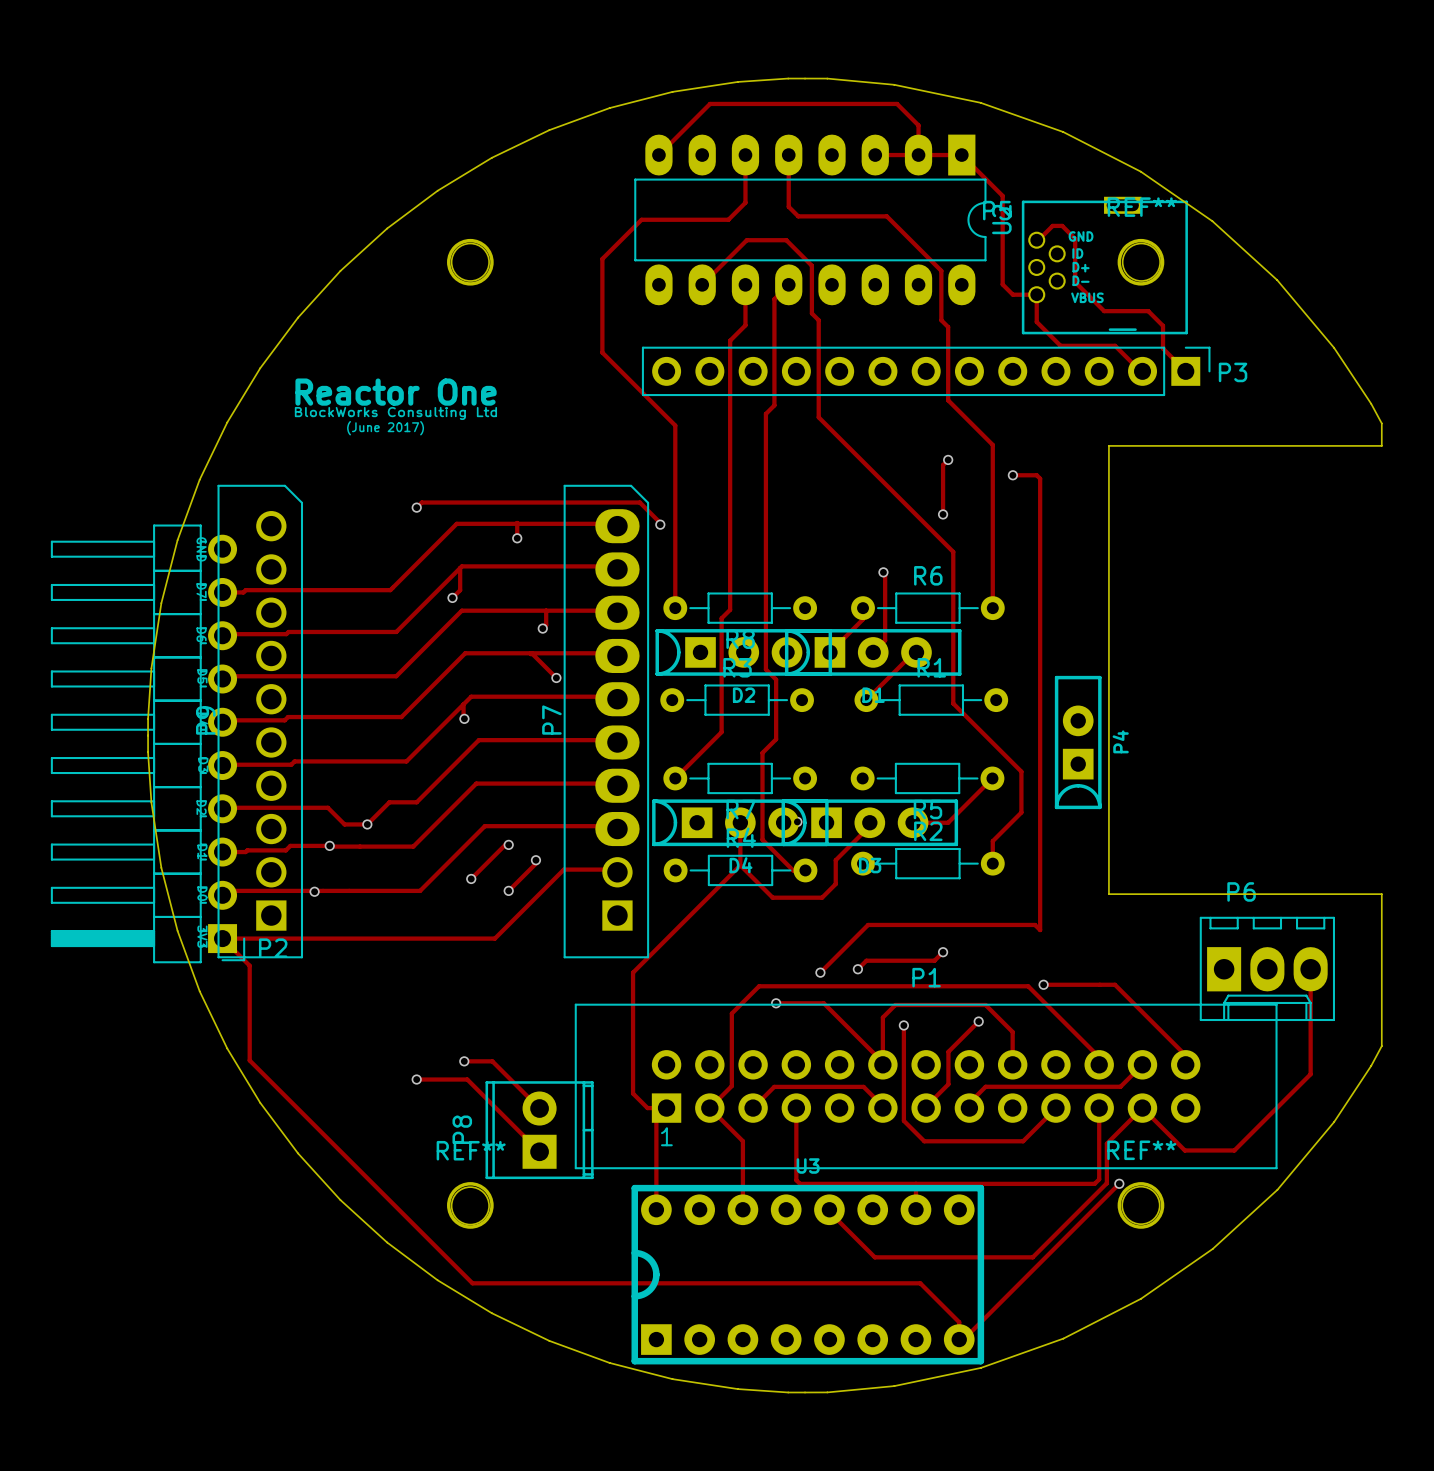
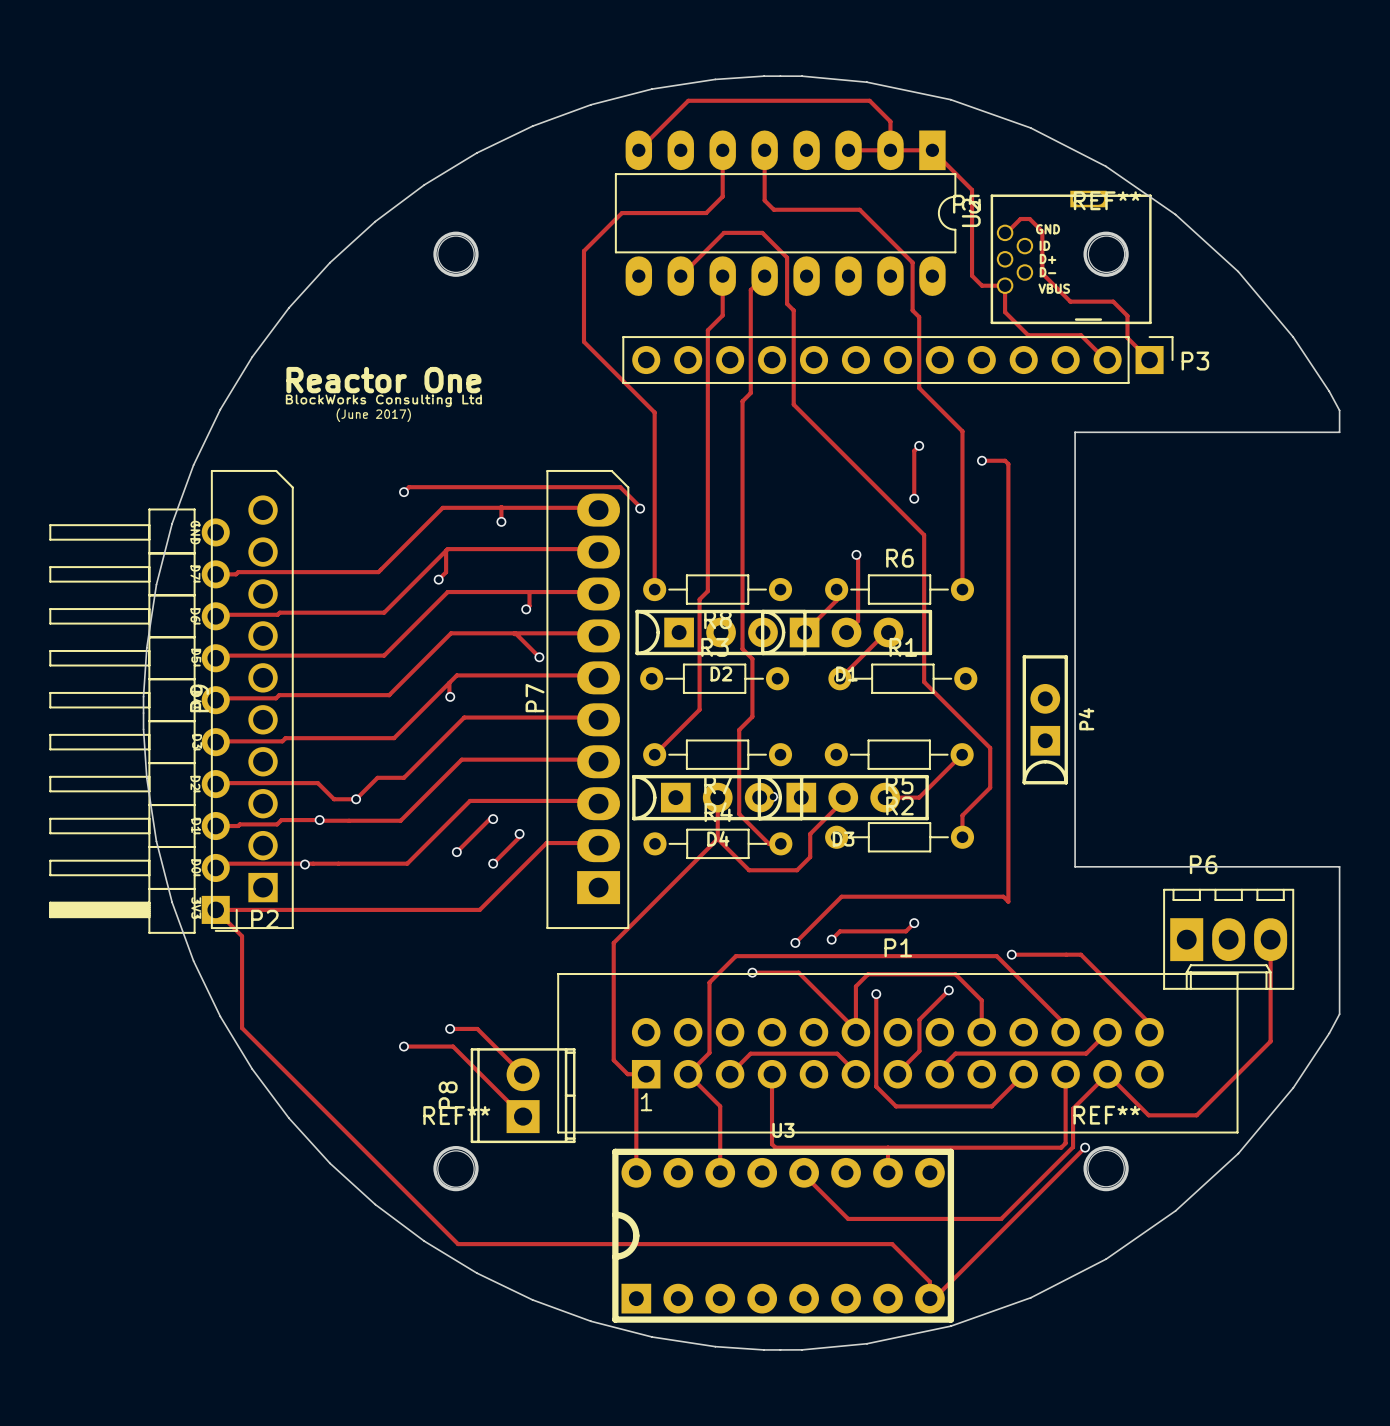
P7 footprint: [563, 484, 650, 959] -> [546, 469, 630, 930]

